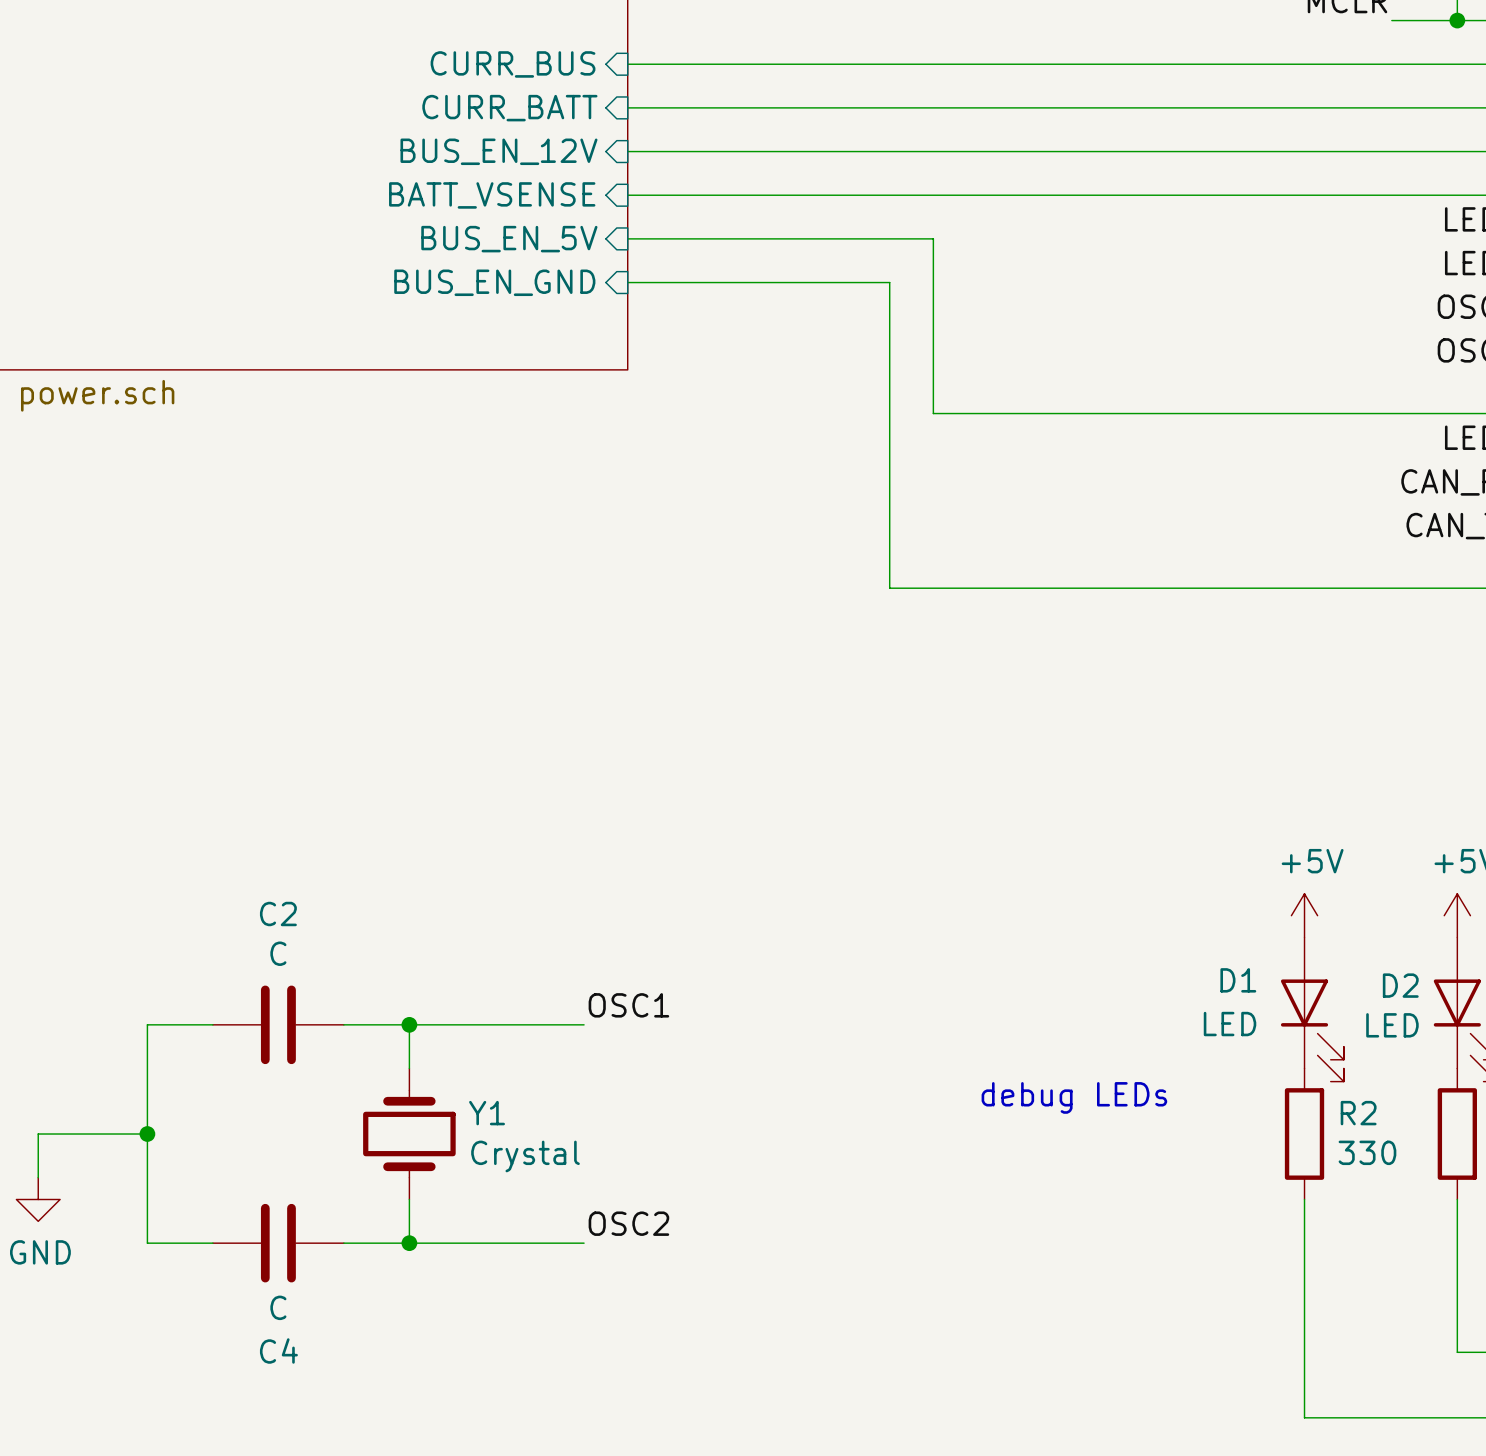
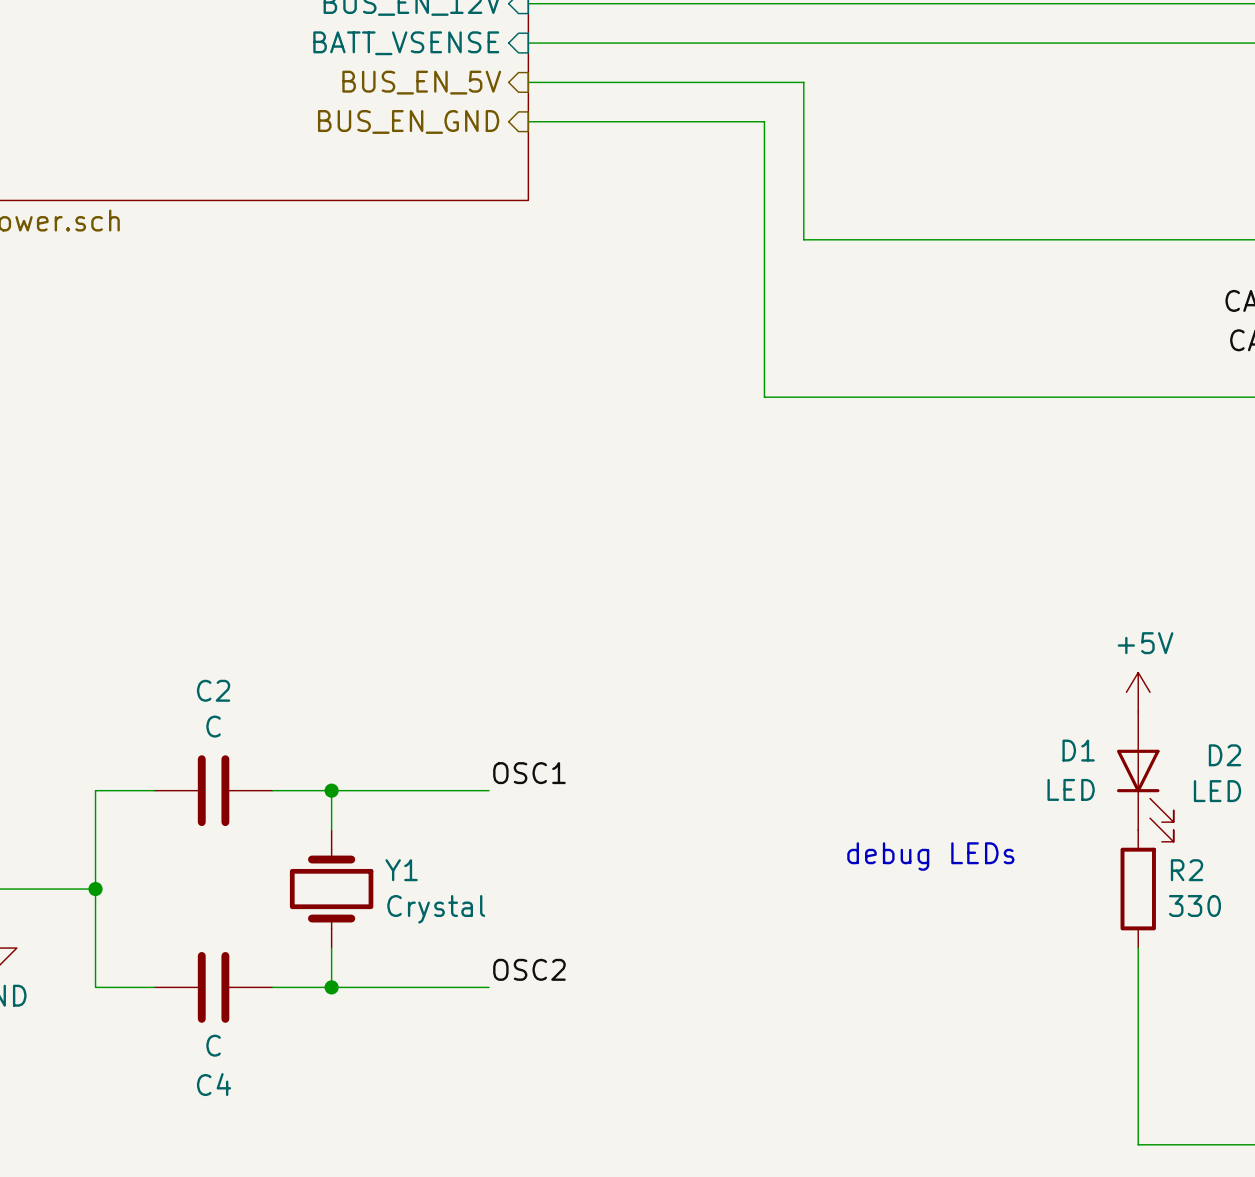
sheet pin: BUS_EN_5V (509, 239) -> none
hierarchical label: none -> BUS_EN_5V (421, 82)
sheet pin: BUS_EN_GND (494, 282) -> none
hierarchical label: none -> BUS_EN_GND (408, 121)

